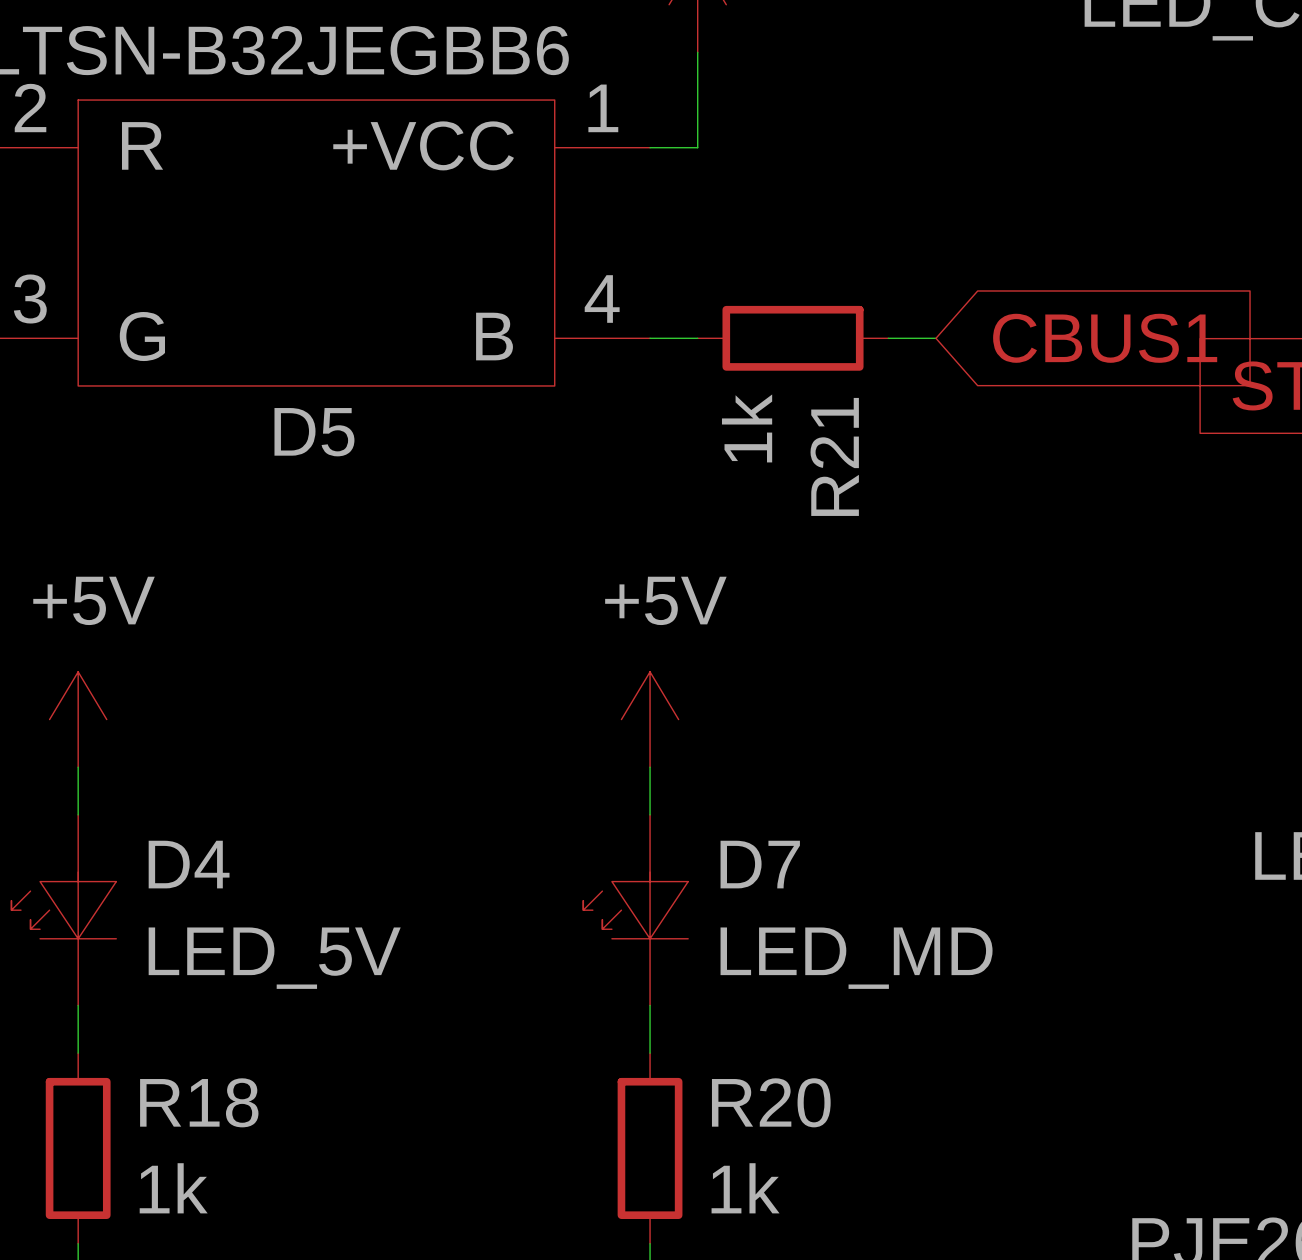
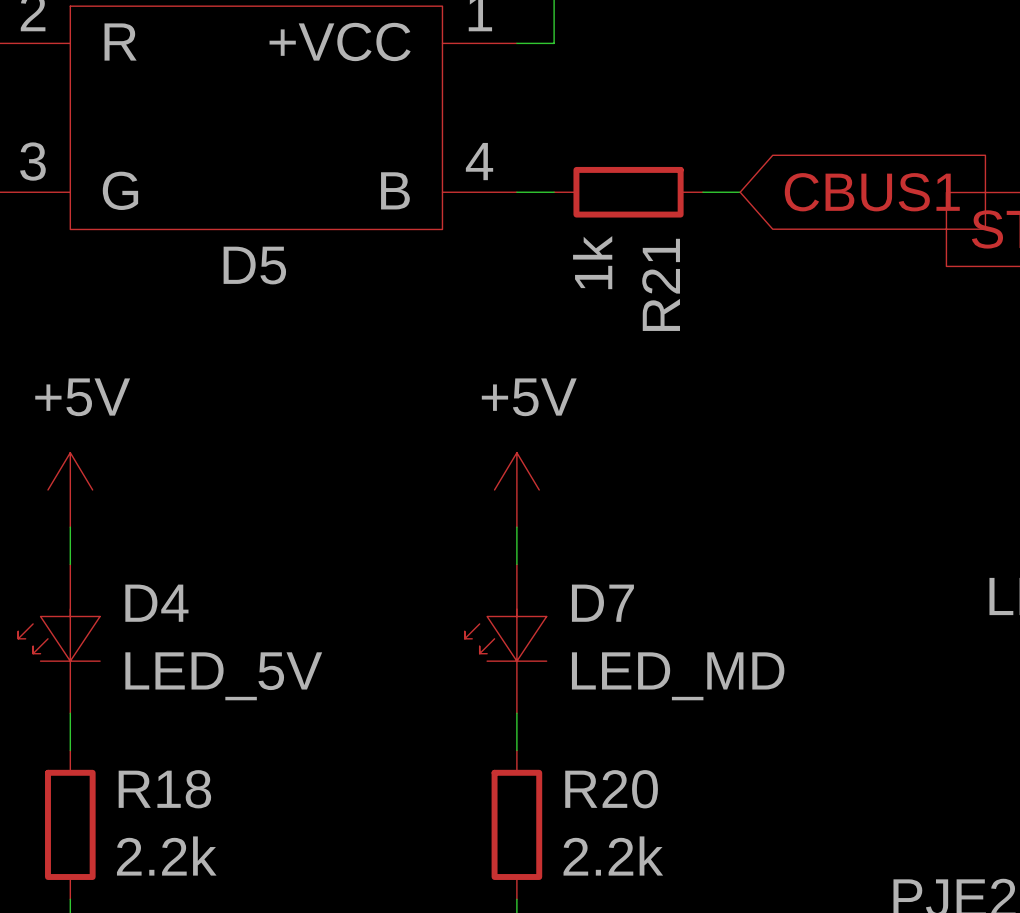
R18 value: 1k (173, 1188) -> 2.2k (166, 856)
R20 value: 1k (745, 1188) -> 2.2k (613, 856)

